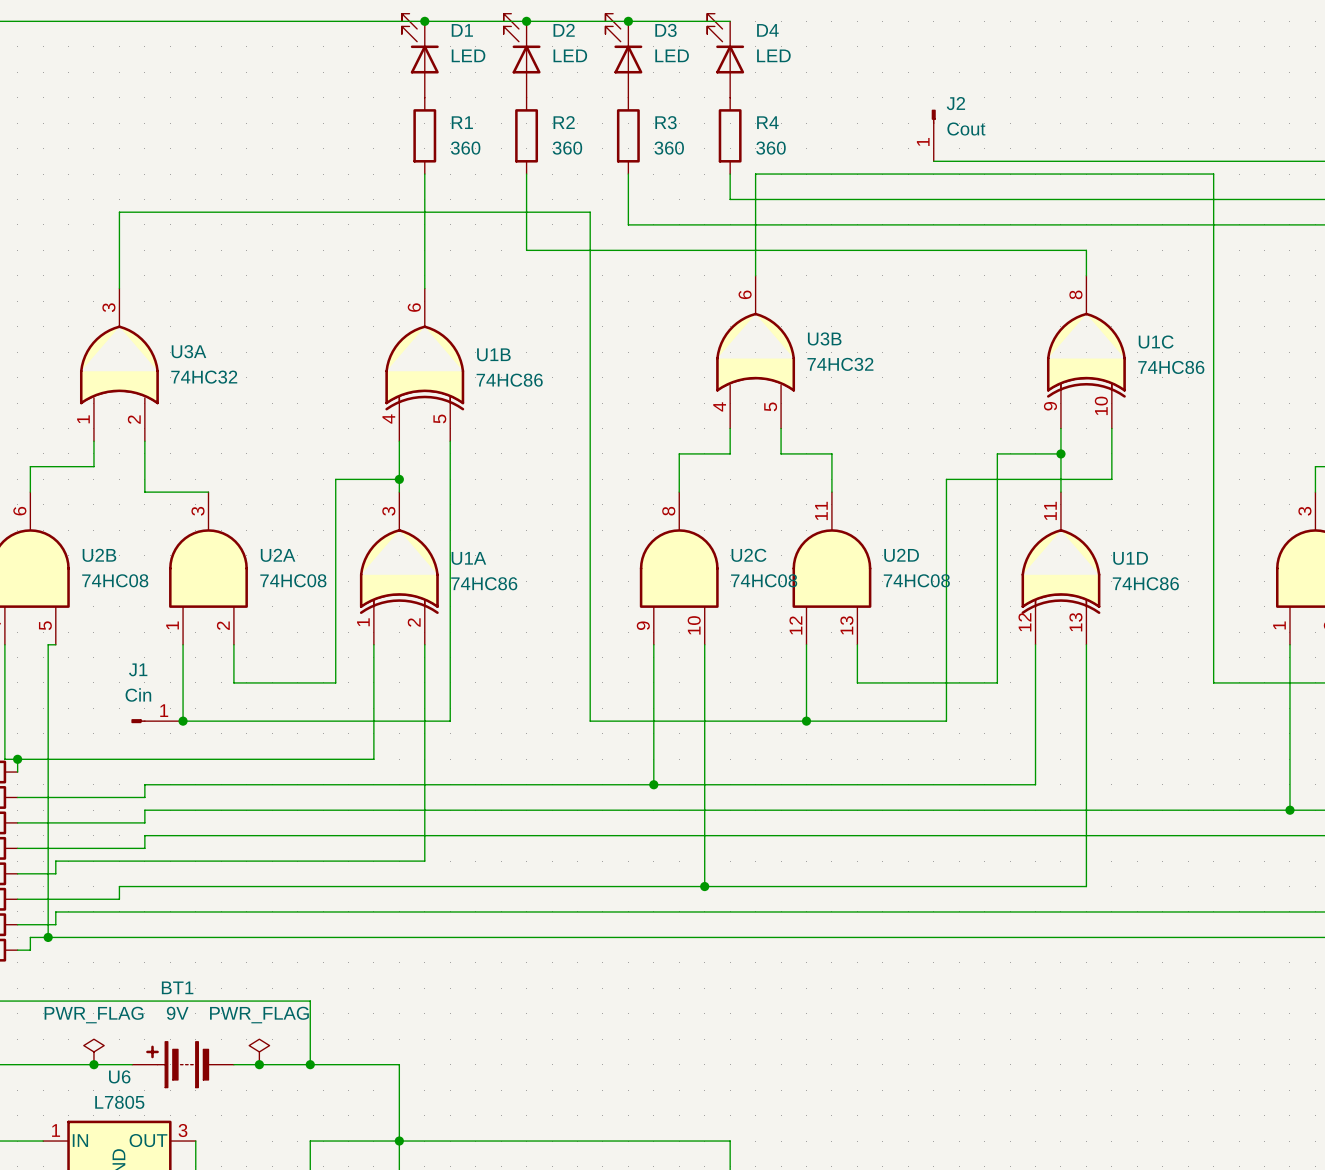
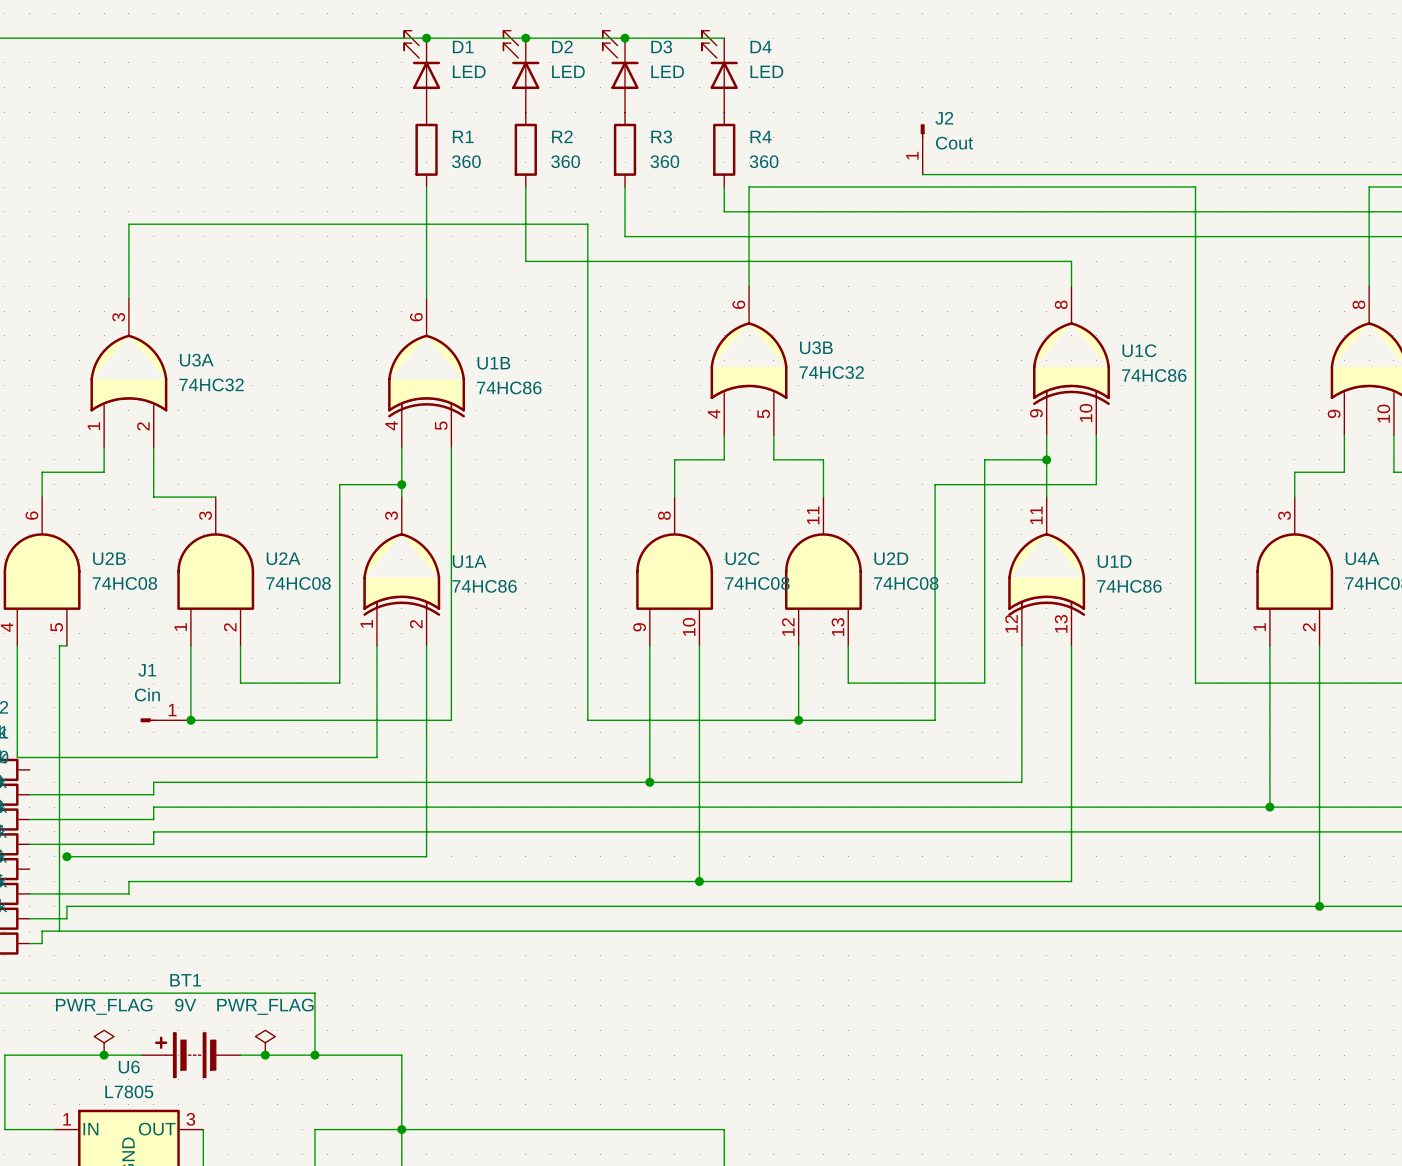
wire: (17, 759) (17, 772) -> none
junction: (17, 759) -> none
wire: (55, 861) (55, 873) (17, 873) -> none
junction: none -> (66, 856)
junction: (48, 937) -> none

